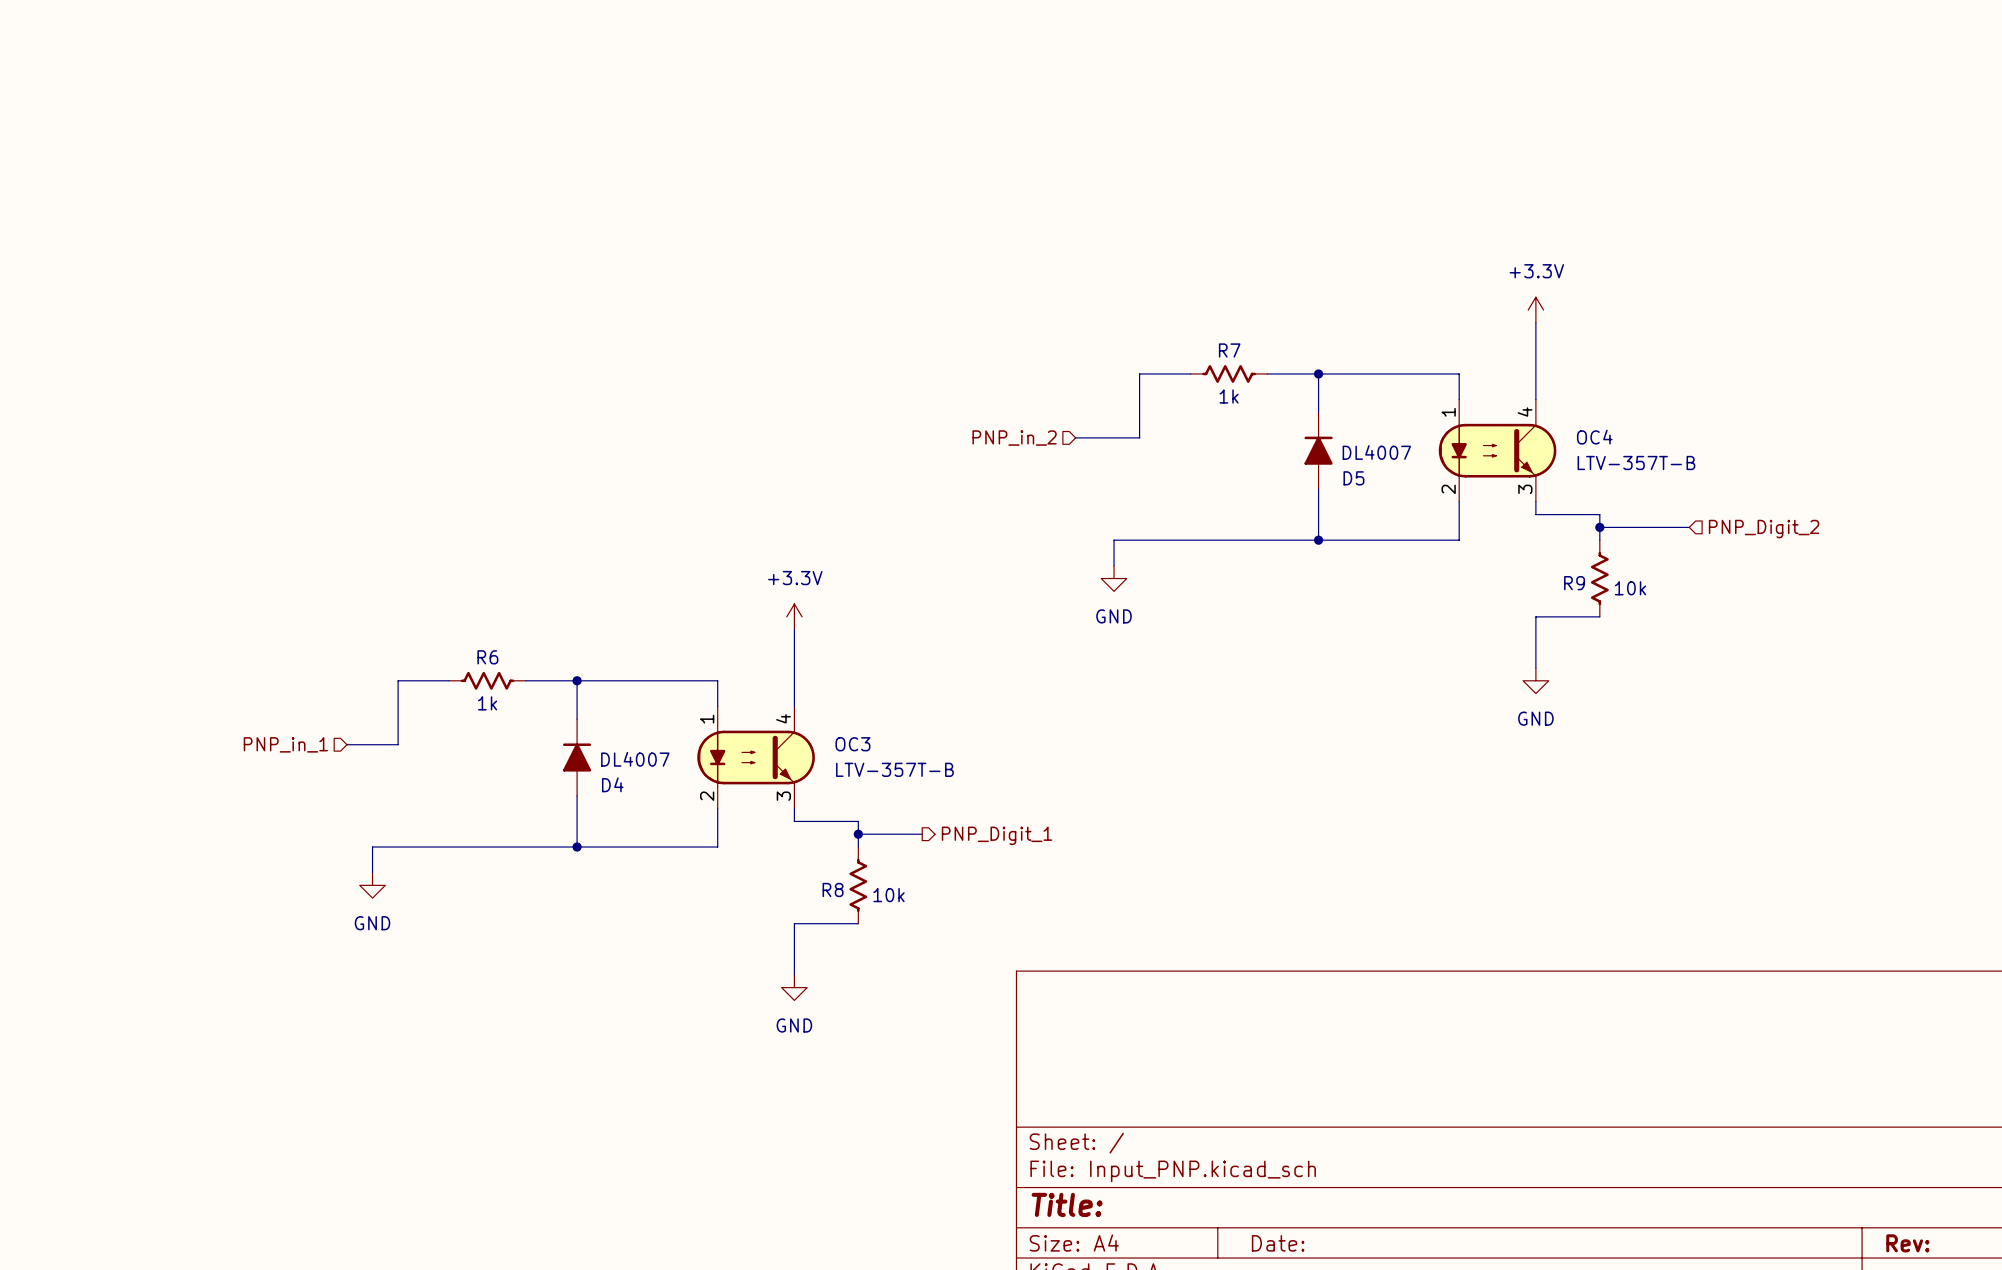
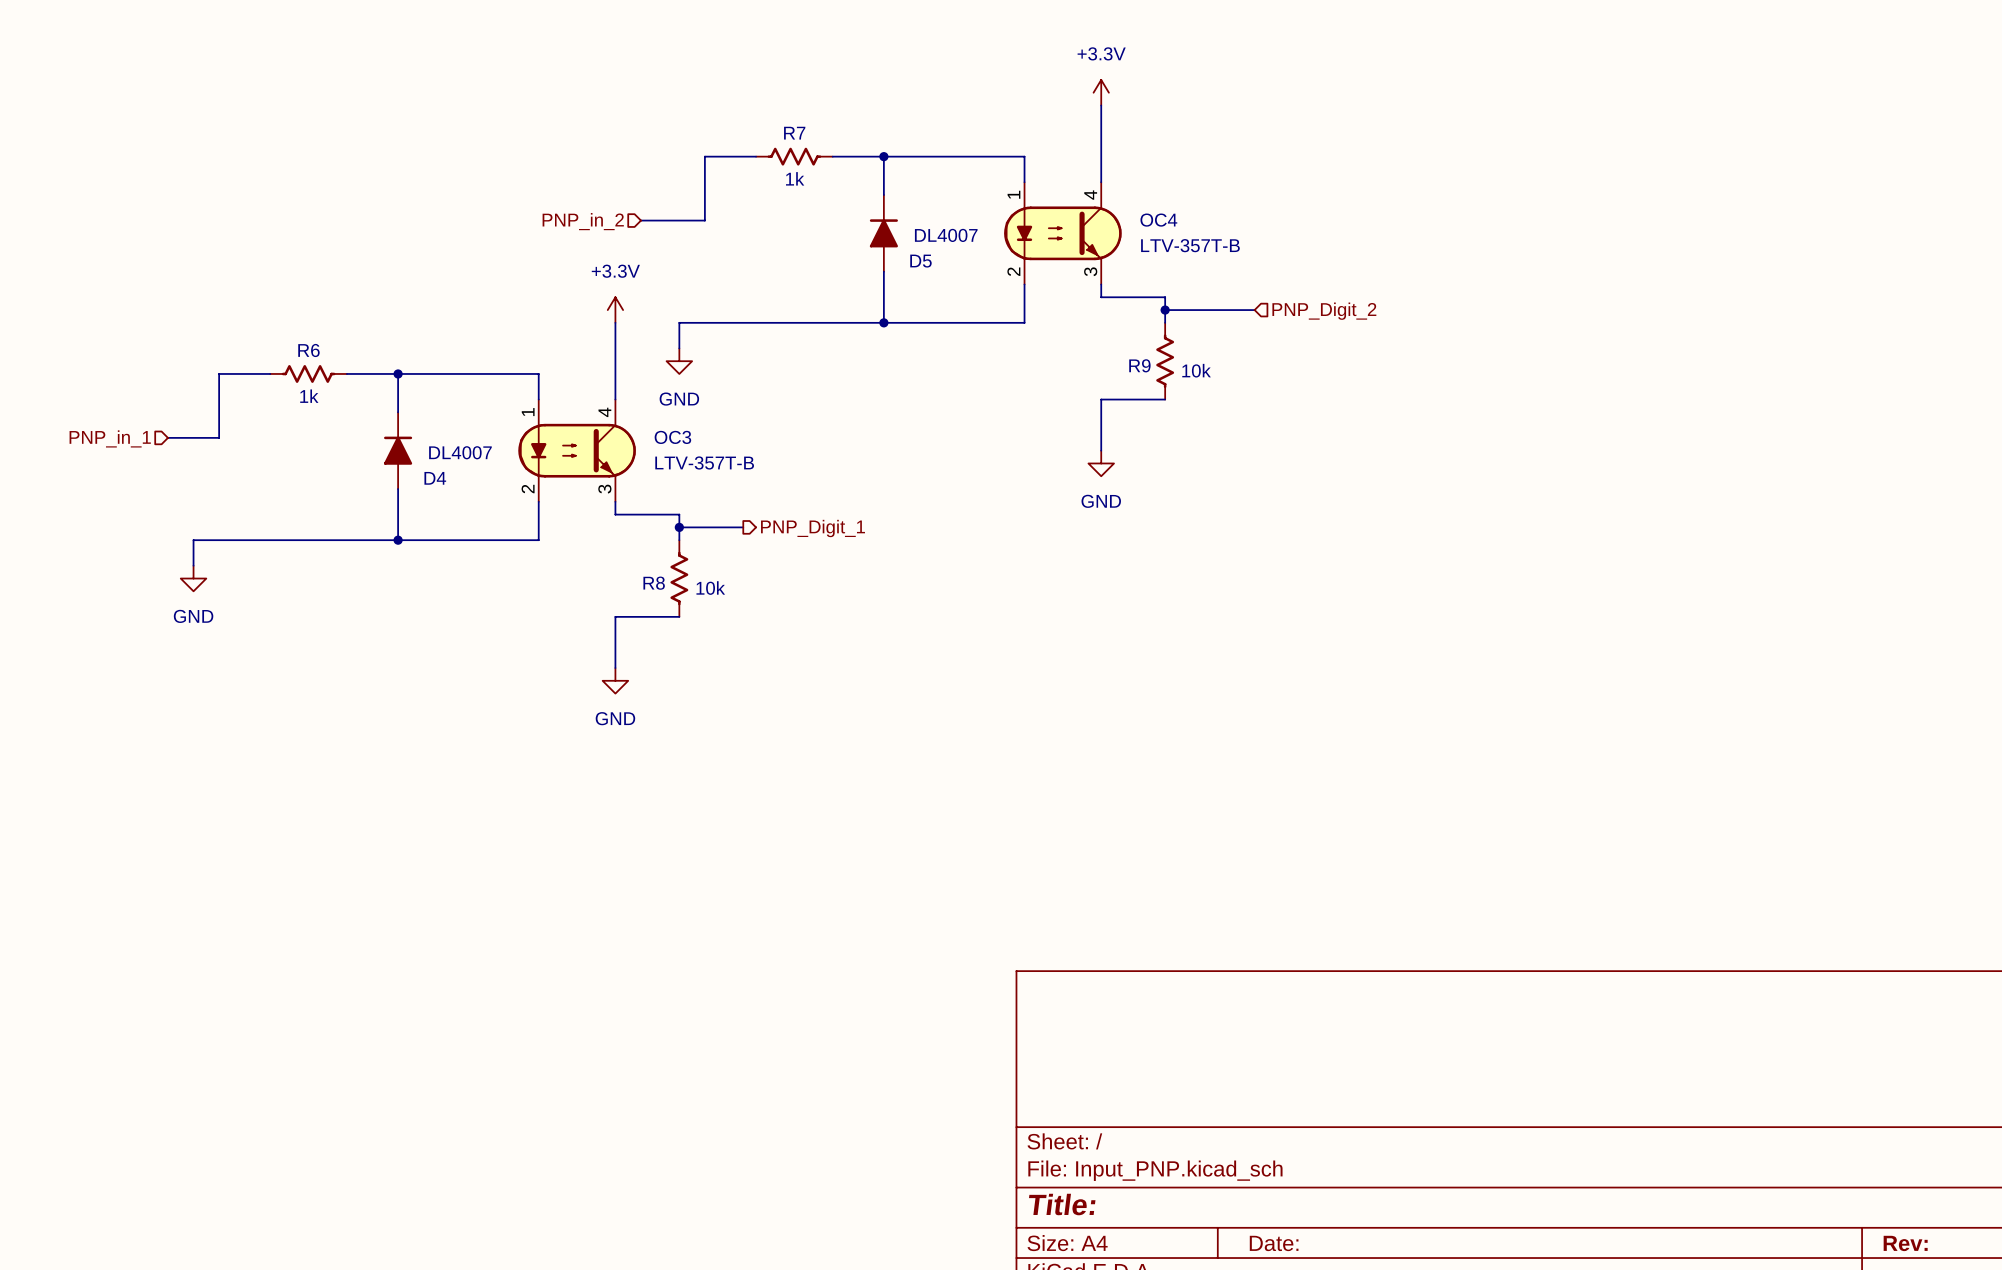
power symbol: none -> +3.3V (1101, 92)
wire: none -> (1101, 105) (1101, 182)
wire: none -> (756, 156) (704, 156) (704, 220) (640, 220)
wire: none -> (832, 156) (1024, 156) (1024, 182)
wire: none -> (883, 156) (883, 195)
junction: none -> (883, 156)
hierarchical label: none -> PNP_in_2 (583, 221)
wire: none -> (883, 271) (883, 322)
wire: none -> (1024, 284) (1024, 322) (679, 322) (679, 348)
wire: none -> (1101, 284) (1101, 297) (1165, 297) (1165, 322)
power symbol: none -> +3.3V (615, 310)
wire: none -> (1165, 310) (1254, 310)
junction: none -> (1165, 310)
power symbol: +3.3V (1535, 310) -> none
hierarchical label: none -> PNP_Digit_2 (1324, 311)
wire: none -> (615, 322) (615, 399)
junction: none -> (883, 322)
wire: (1535, 322) (1535, 399) -> none
power symbol: none -> GND (679, 361)
wire: none -> (270, 373) (219, 373) (219, 437) (167, 437)
wire: none -> (346, 373) (538, 373) (538, 399)
wire: none -> (398, 373) (398, 412)
junction: none -> (398, 373)
wire: (1190, 373) (1139, 373) (1139, 437) (1075, 437) -> none
R7 position: (1229, 373) -> (794, 156)
wire: (1267, 373) (1459, 373) (1459, 399) -> none
wire: (1318, 373) (1318, 412) -> none
junction: (1318, 373) -> none
wire: none -> (1165, 399) (1101, 399) (1101, 450)
hierarchical label: none -> PNP_in_1 (110, 438)
hierarchical label: PNP_in_2 (1014, 438) -> none
D5 position: (1318, 450) -> (883, 233)
OC4 position: (1497, 450) -> (1062, 233)
wire: none -> (398, 489) (398, 540)
wire: (1318, 489) (1318, 540) -> none
wire: none -> (538, 501) (538, 540) (193, 540) (193, 565)
wire: none -> (615, 501) (615, 514) (679, 514) (679, 540)
wire: (1459, 501) (1459, 540) (1114, 540) (1114, 565) -> none
wire: (1535, 501) (1535, 514) (1599, 514) (1599, 540) -> none
wire: none -> (679, 527) (743, 527)
junction: none -> (679, 527)
wire: (1599, 527) (1689, 527) -> none
junction: (1599, 527) -> none
hierarchical label: none -> PNP_Digit_1 (813, 528)
hierarchical label: PNP_Digit_2 (1764, 529) -> none
junction: none -> (398, 540)
junction: (1318, 540) -> none
power symbol: none -> GND (193, 578)
power symbol position: GND (1114, 578) -> GND (1101, 463)
R9 position: (1599, 578) -> (1165, 361)
wire: none -> (679, 616) (615, 616) (615, 668)
power symbol: +3.3V (794, 616) -> none
wire: (1599, 616) (1535, 616) (1535, 668) -> none
wire: (794, 629) (794, 706) -> none
wire: (449, 680) (398, 680) (398, 744) (346, 744) -> none
R6 position: (487, 680) -> (308, 373)
wire: (525, 680) (717, 680) (717, 706) -> none
wire: (577, 680) (577, 719) -> none
junction: (577, 680) -> none
power symbol: none -> GND (615, 680)
power symbol: GND (1535, 680) -> none
hierarchical label: PNP_in_1 (285, 744) -> none
D4 position: (577, 757) -> (398, 450)
OC3 position: (756, 757) -> (577, 450)
wire: (577, 795) (577, 847) -> none
wire: (717, 808) (717, 847) (372, 847) (372, 872) -> none
wire: (794, 808) (794, 821) (858, 821) (858, 847) -> none
wire: (858, 834) (922, 834) -> none
junction: (858, 834) -> none
hierarchical label: PNP_Digit_1 (997, 835) -> none
junction: (577, 847) -> none
power symbol: GND (372, 885) -> none
R8 position: (858, 885) -> (679, 578)
wire: (858, 923) (794, 923) (794, 974) -> none
power symbol: GND (794, 987) -> none

